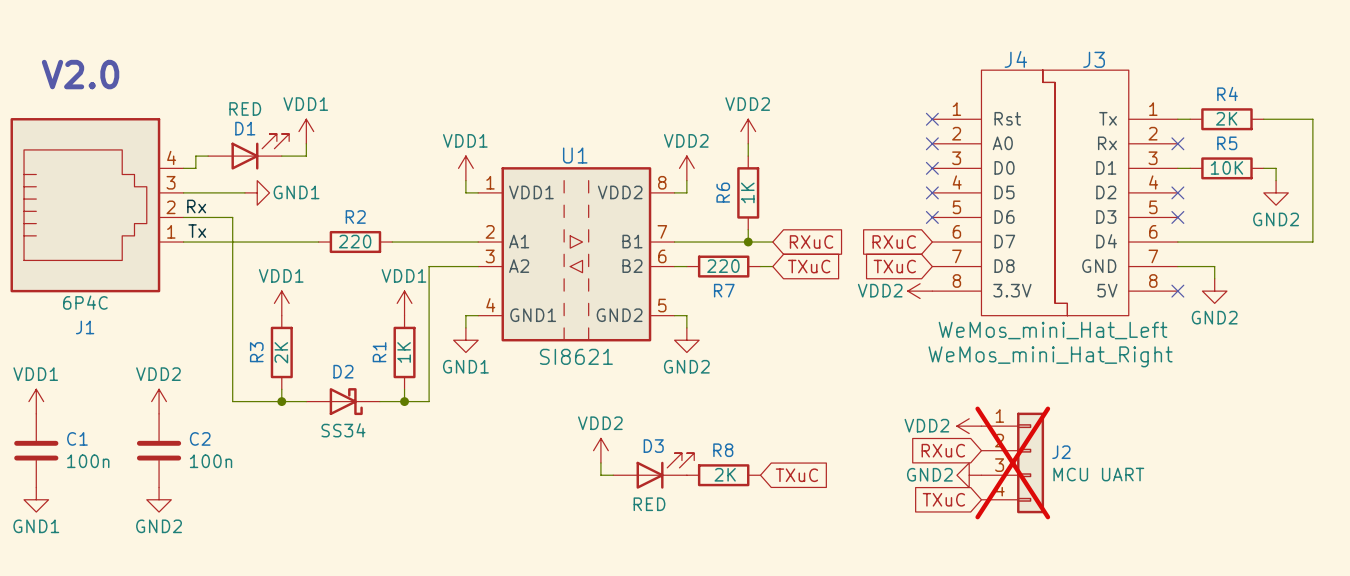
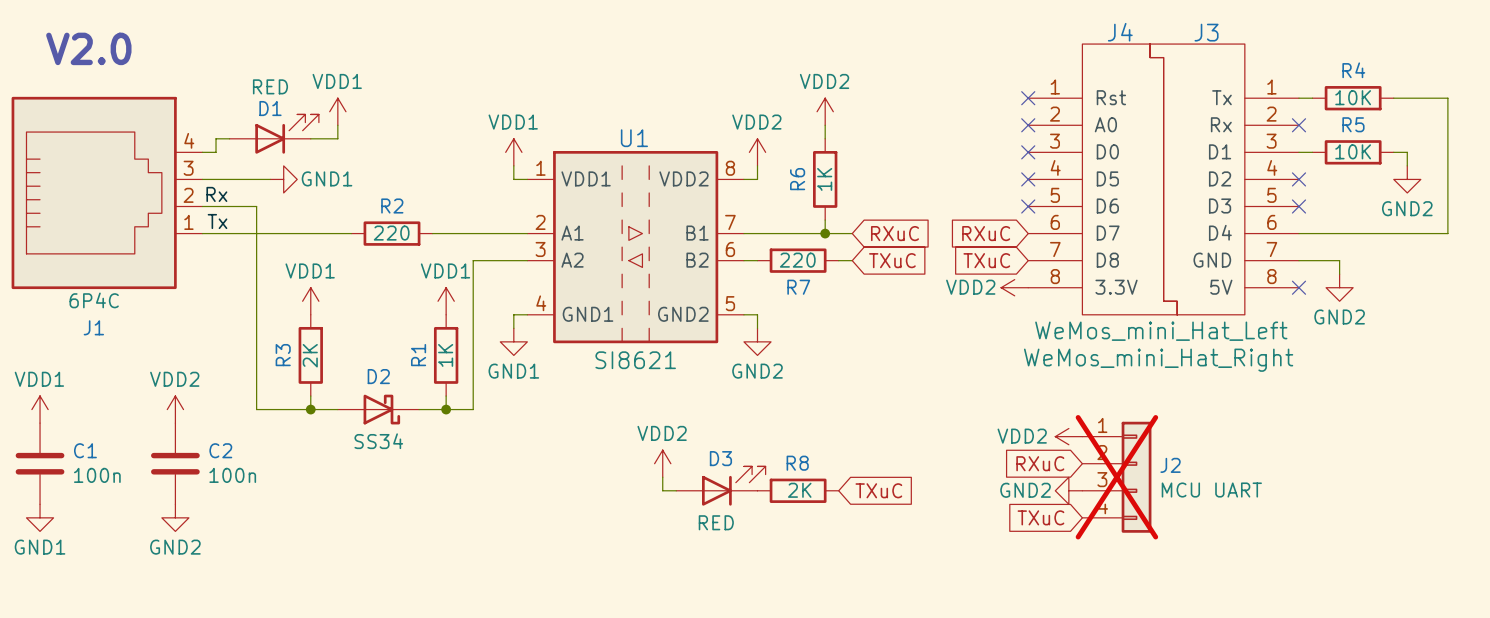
R4 value: 2K (1226, 118) -> 10K (1353, 97)

